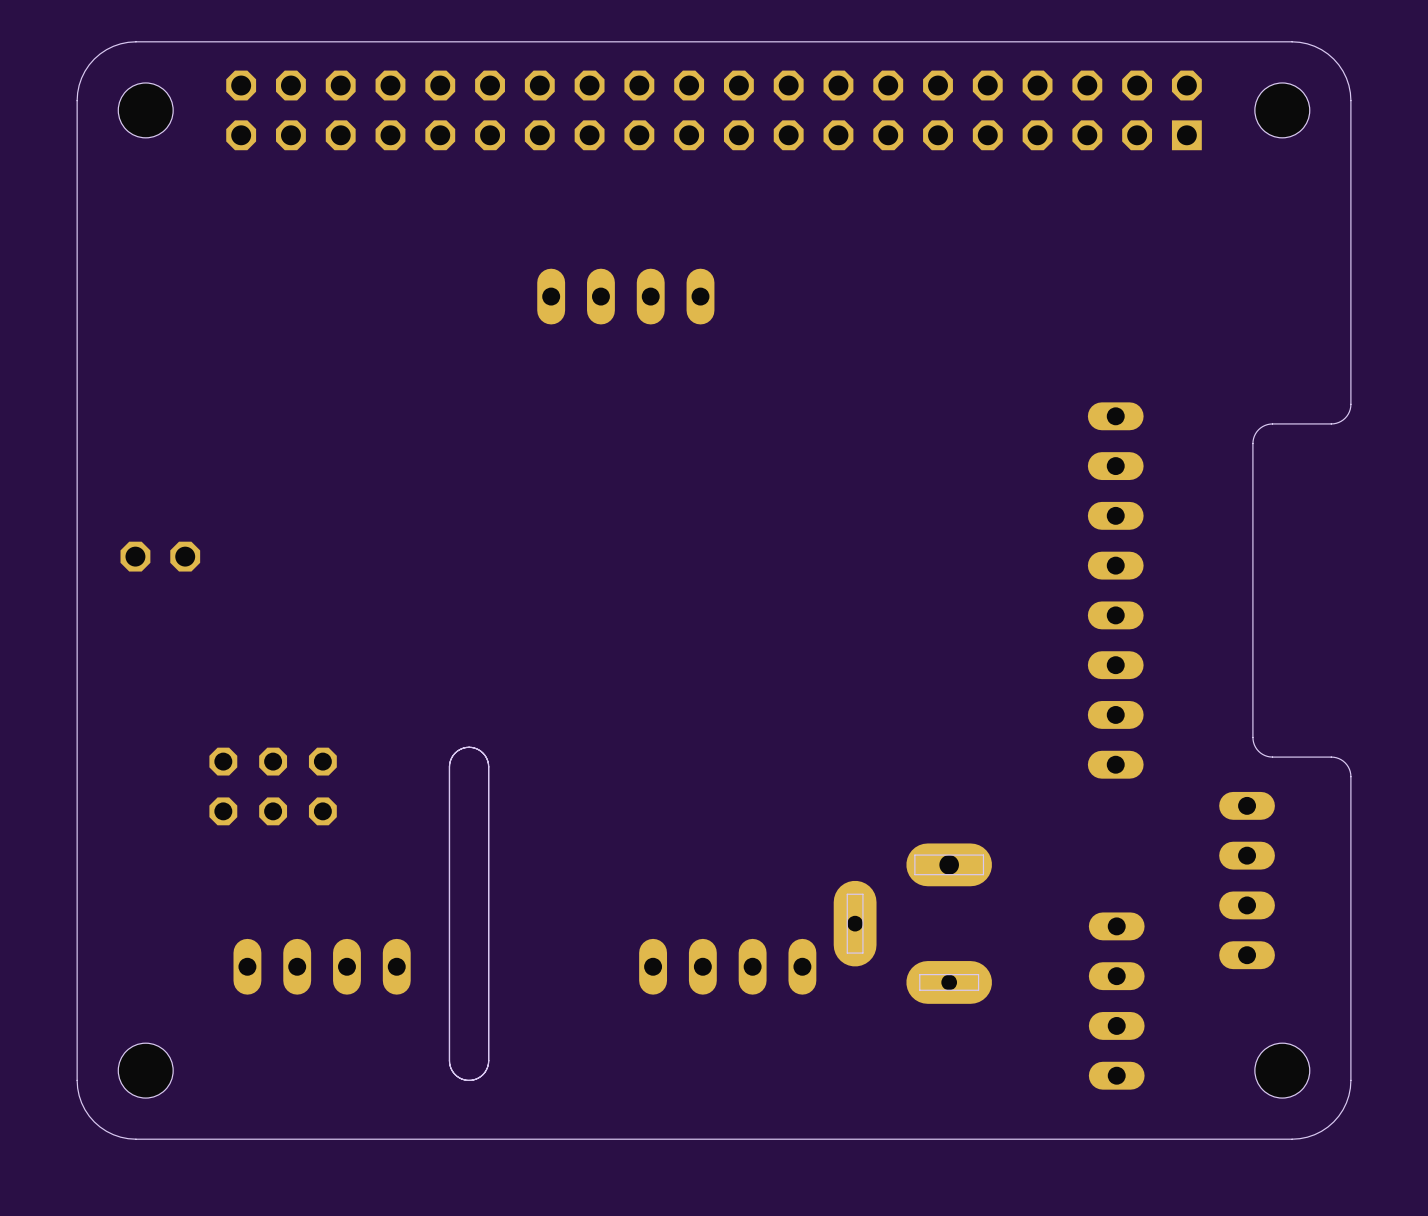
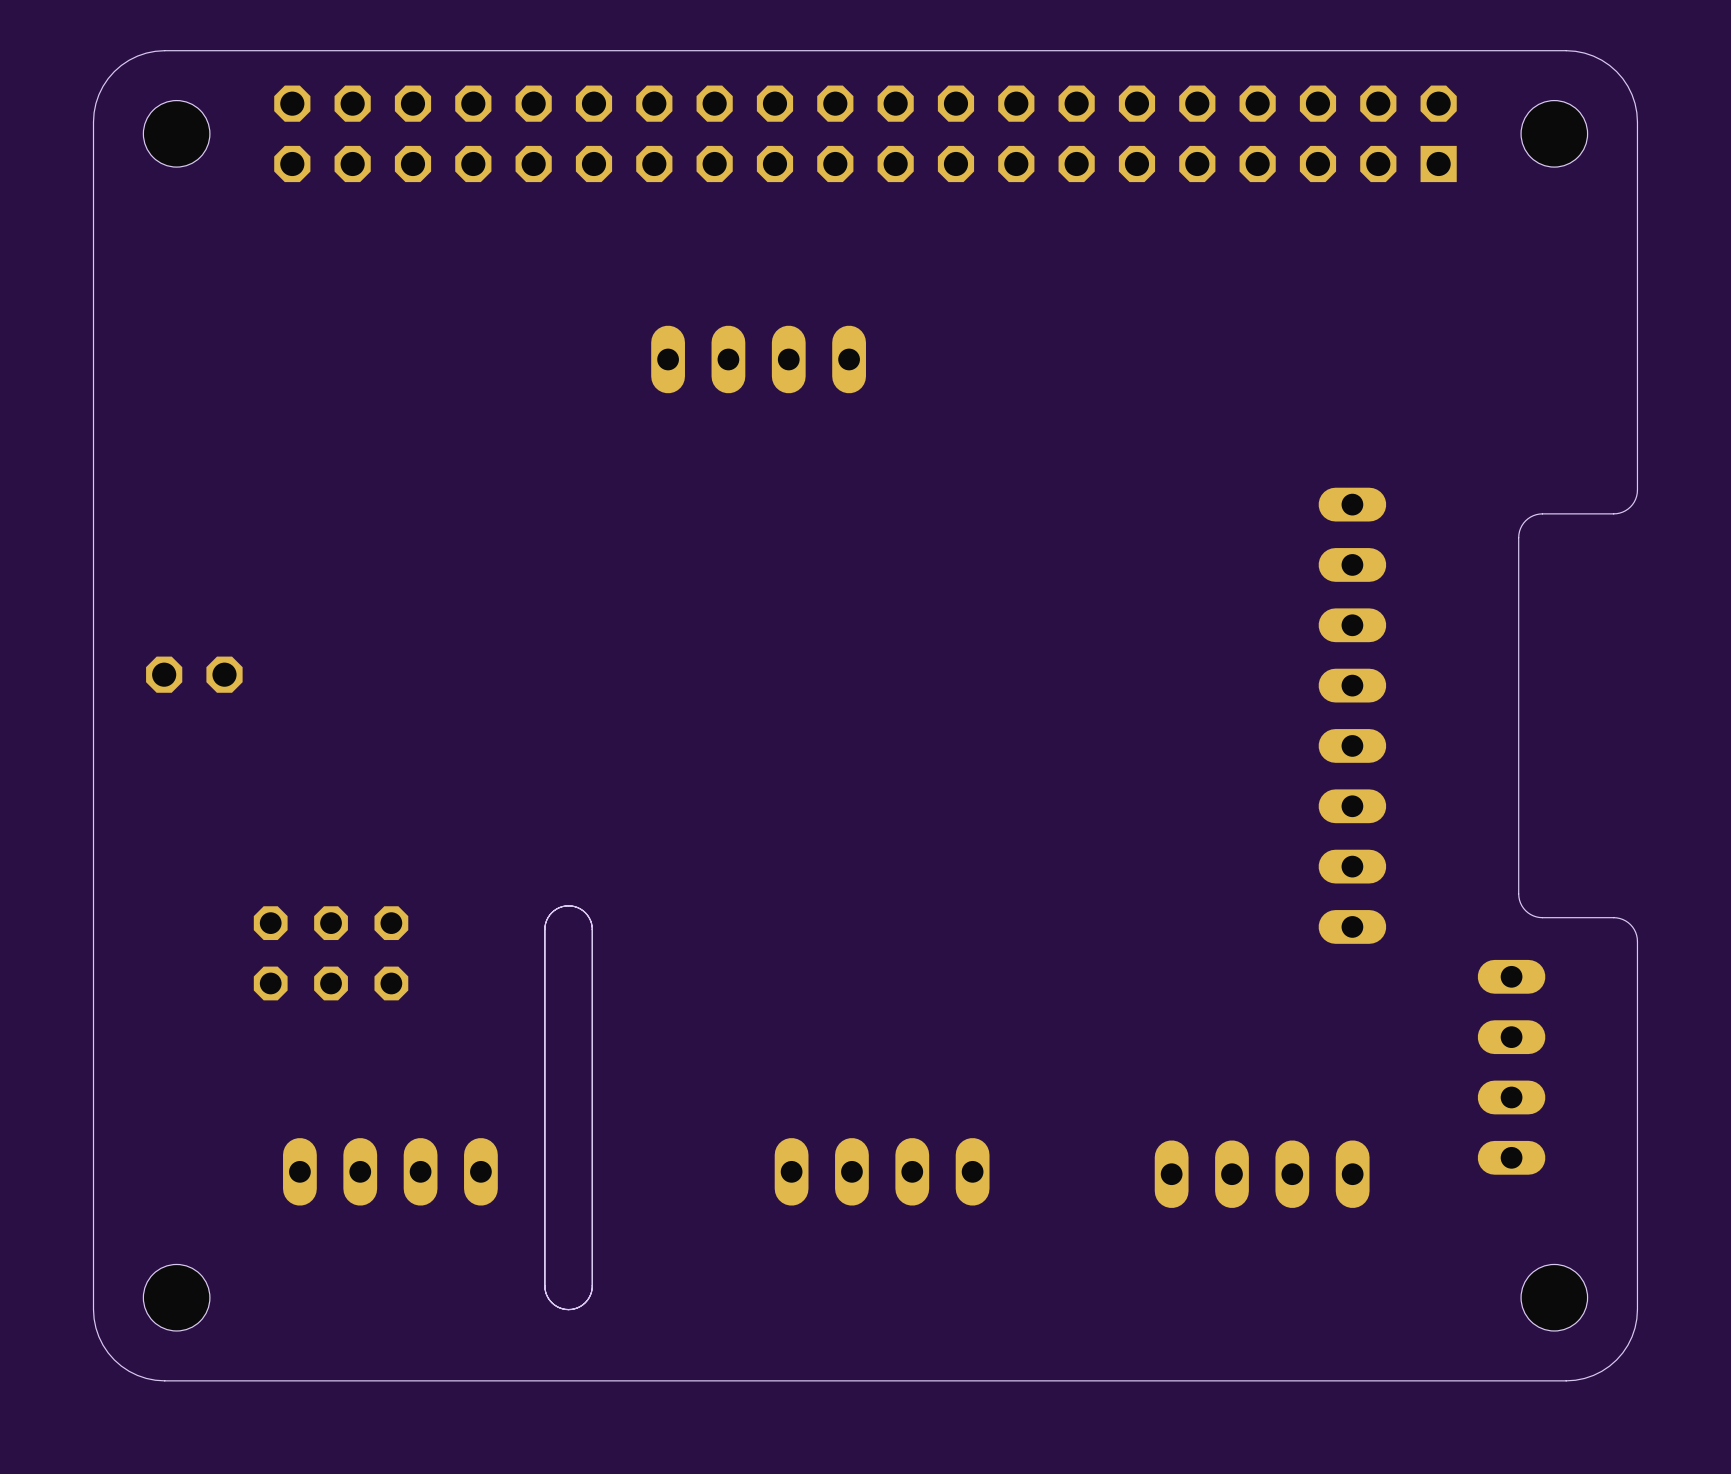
part: (912, 923) -> none
part rotation: 0° (1116, 1001) -> 90° clockwise (1262, 1174)

